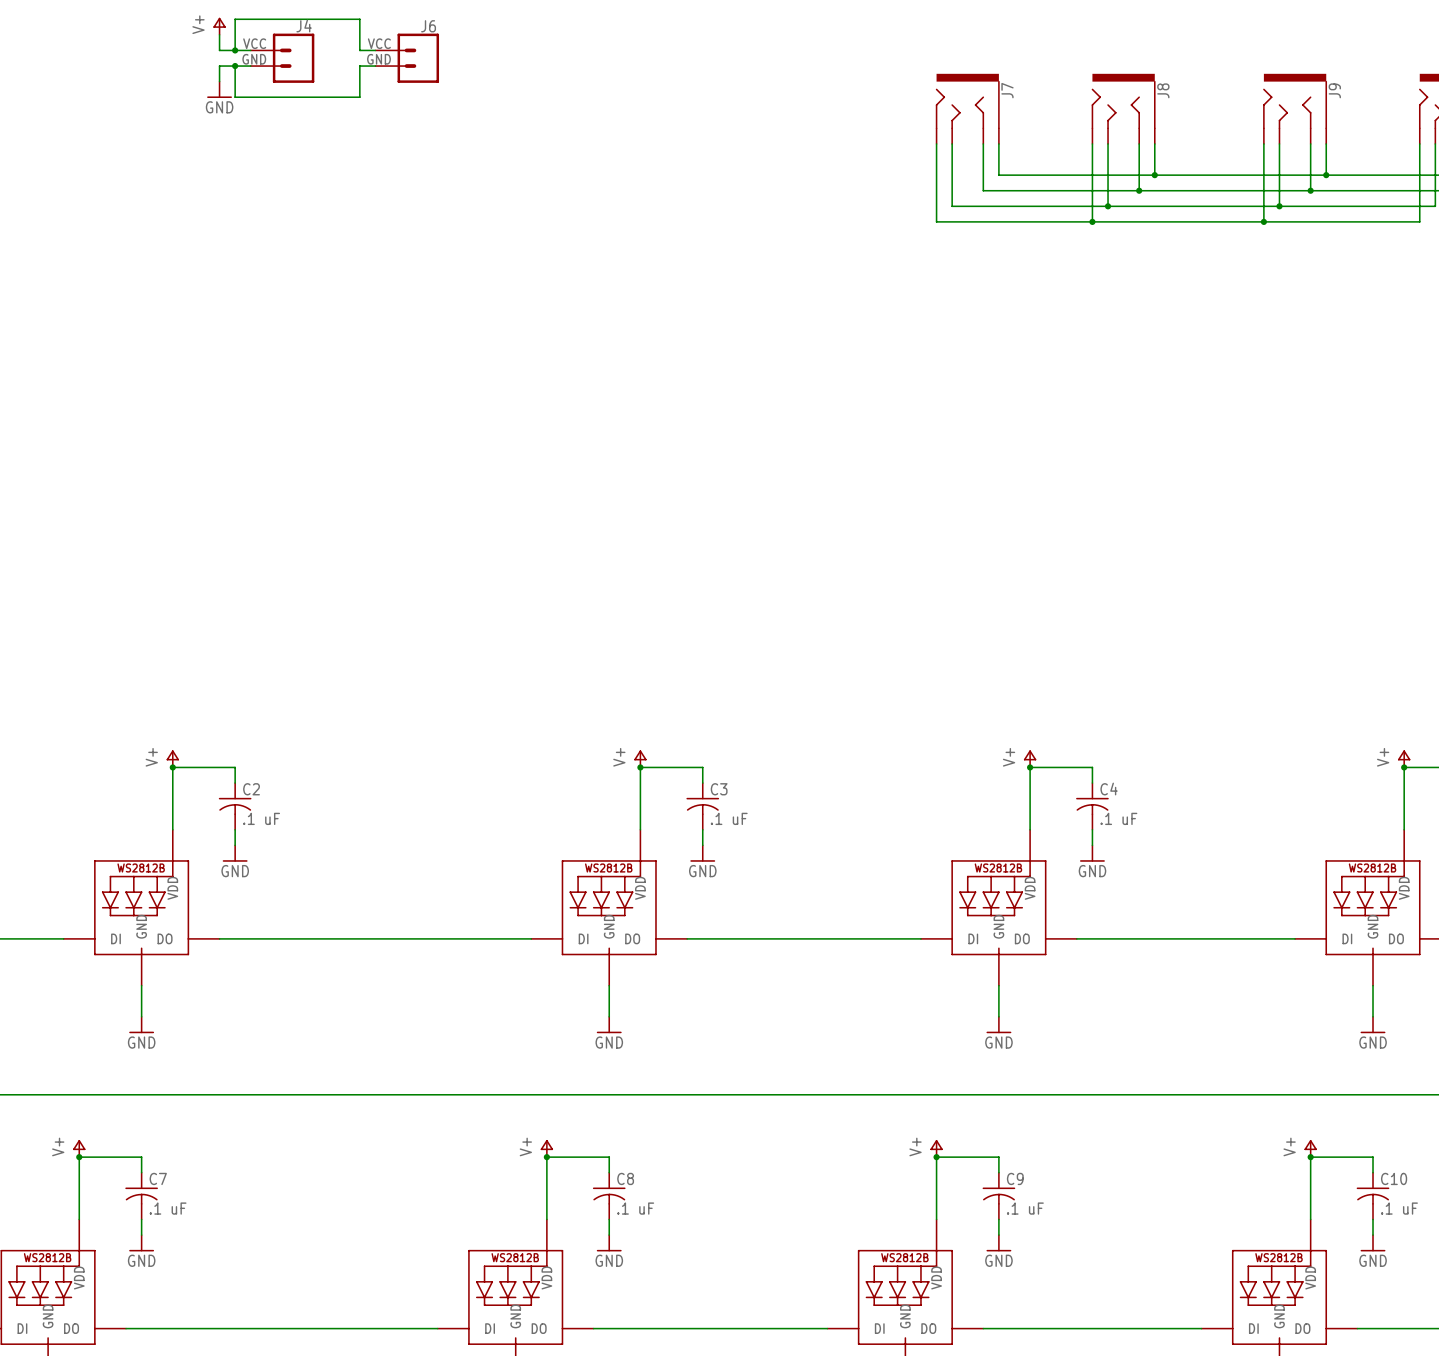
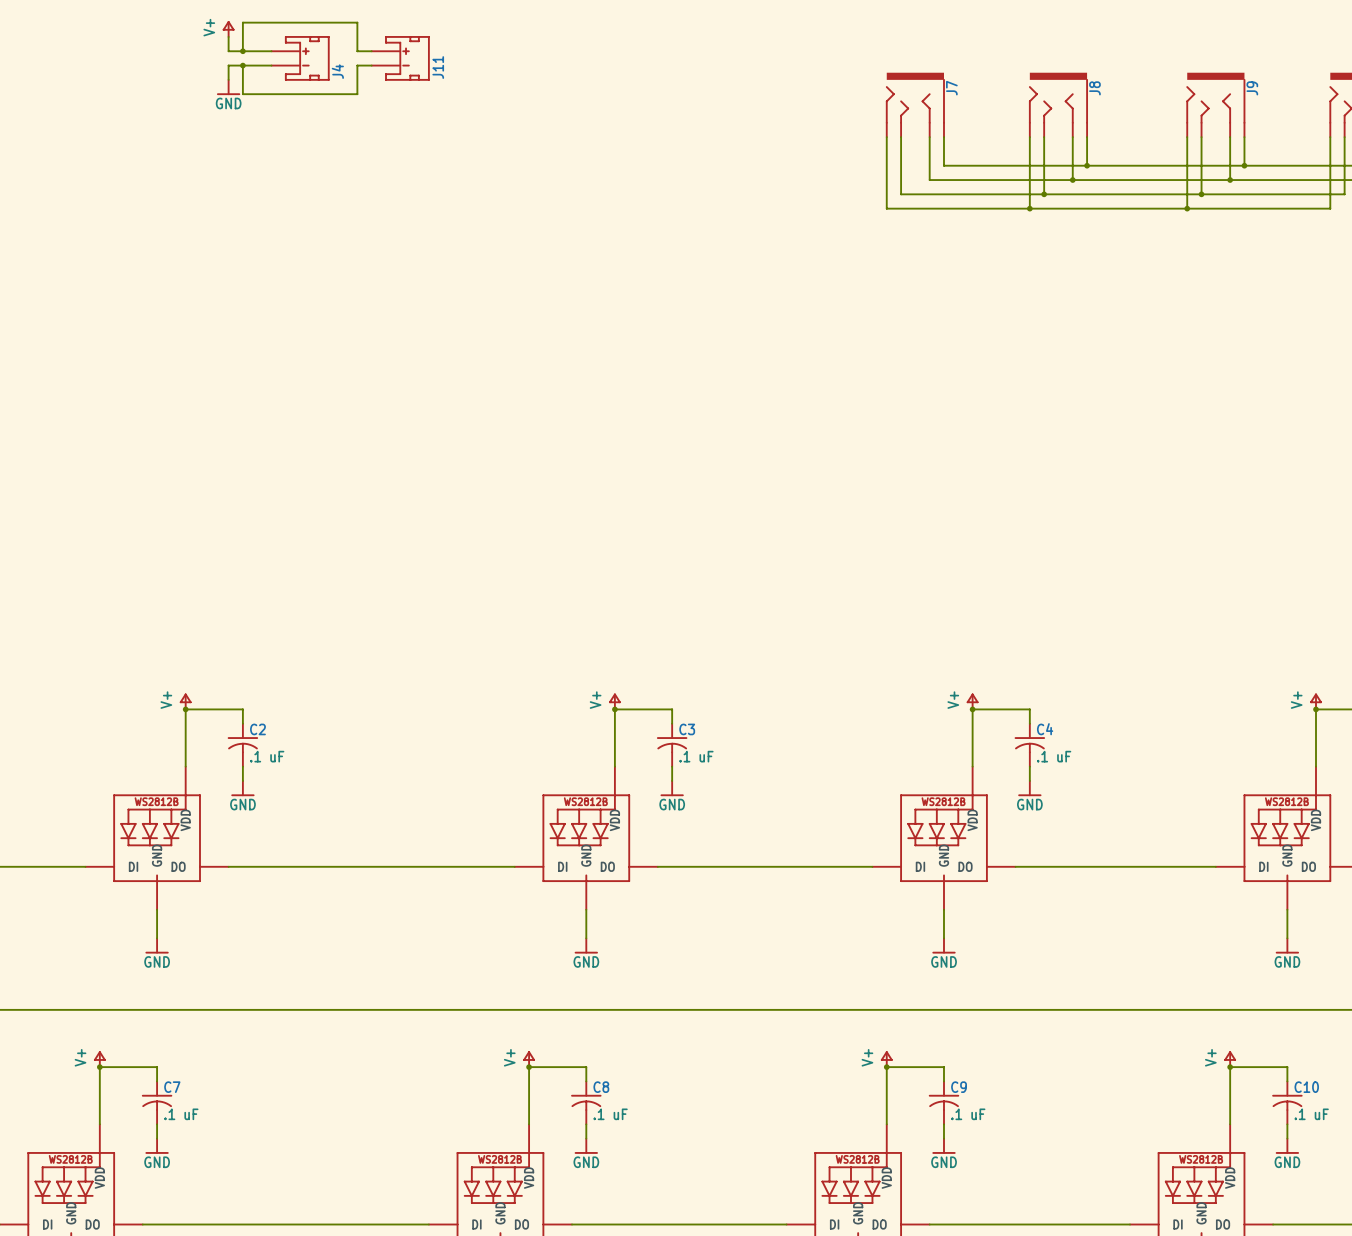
J4 name position: J4 (304, 26) -> J4 (337, 71)
J4 symbol: [250, 33, 315, 83] -> [271, 36, 330, 81]
J11: none -> (400, 58)
J6: (407, 58) -> none

